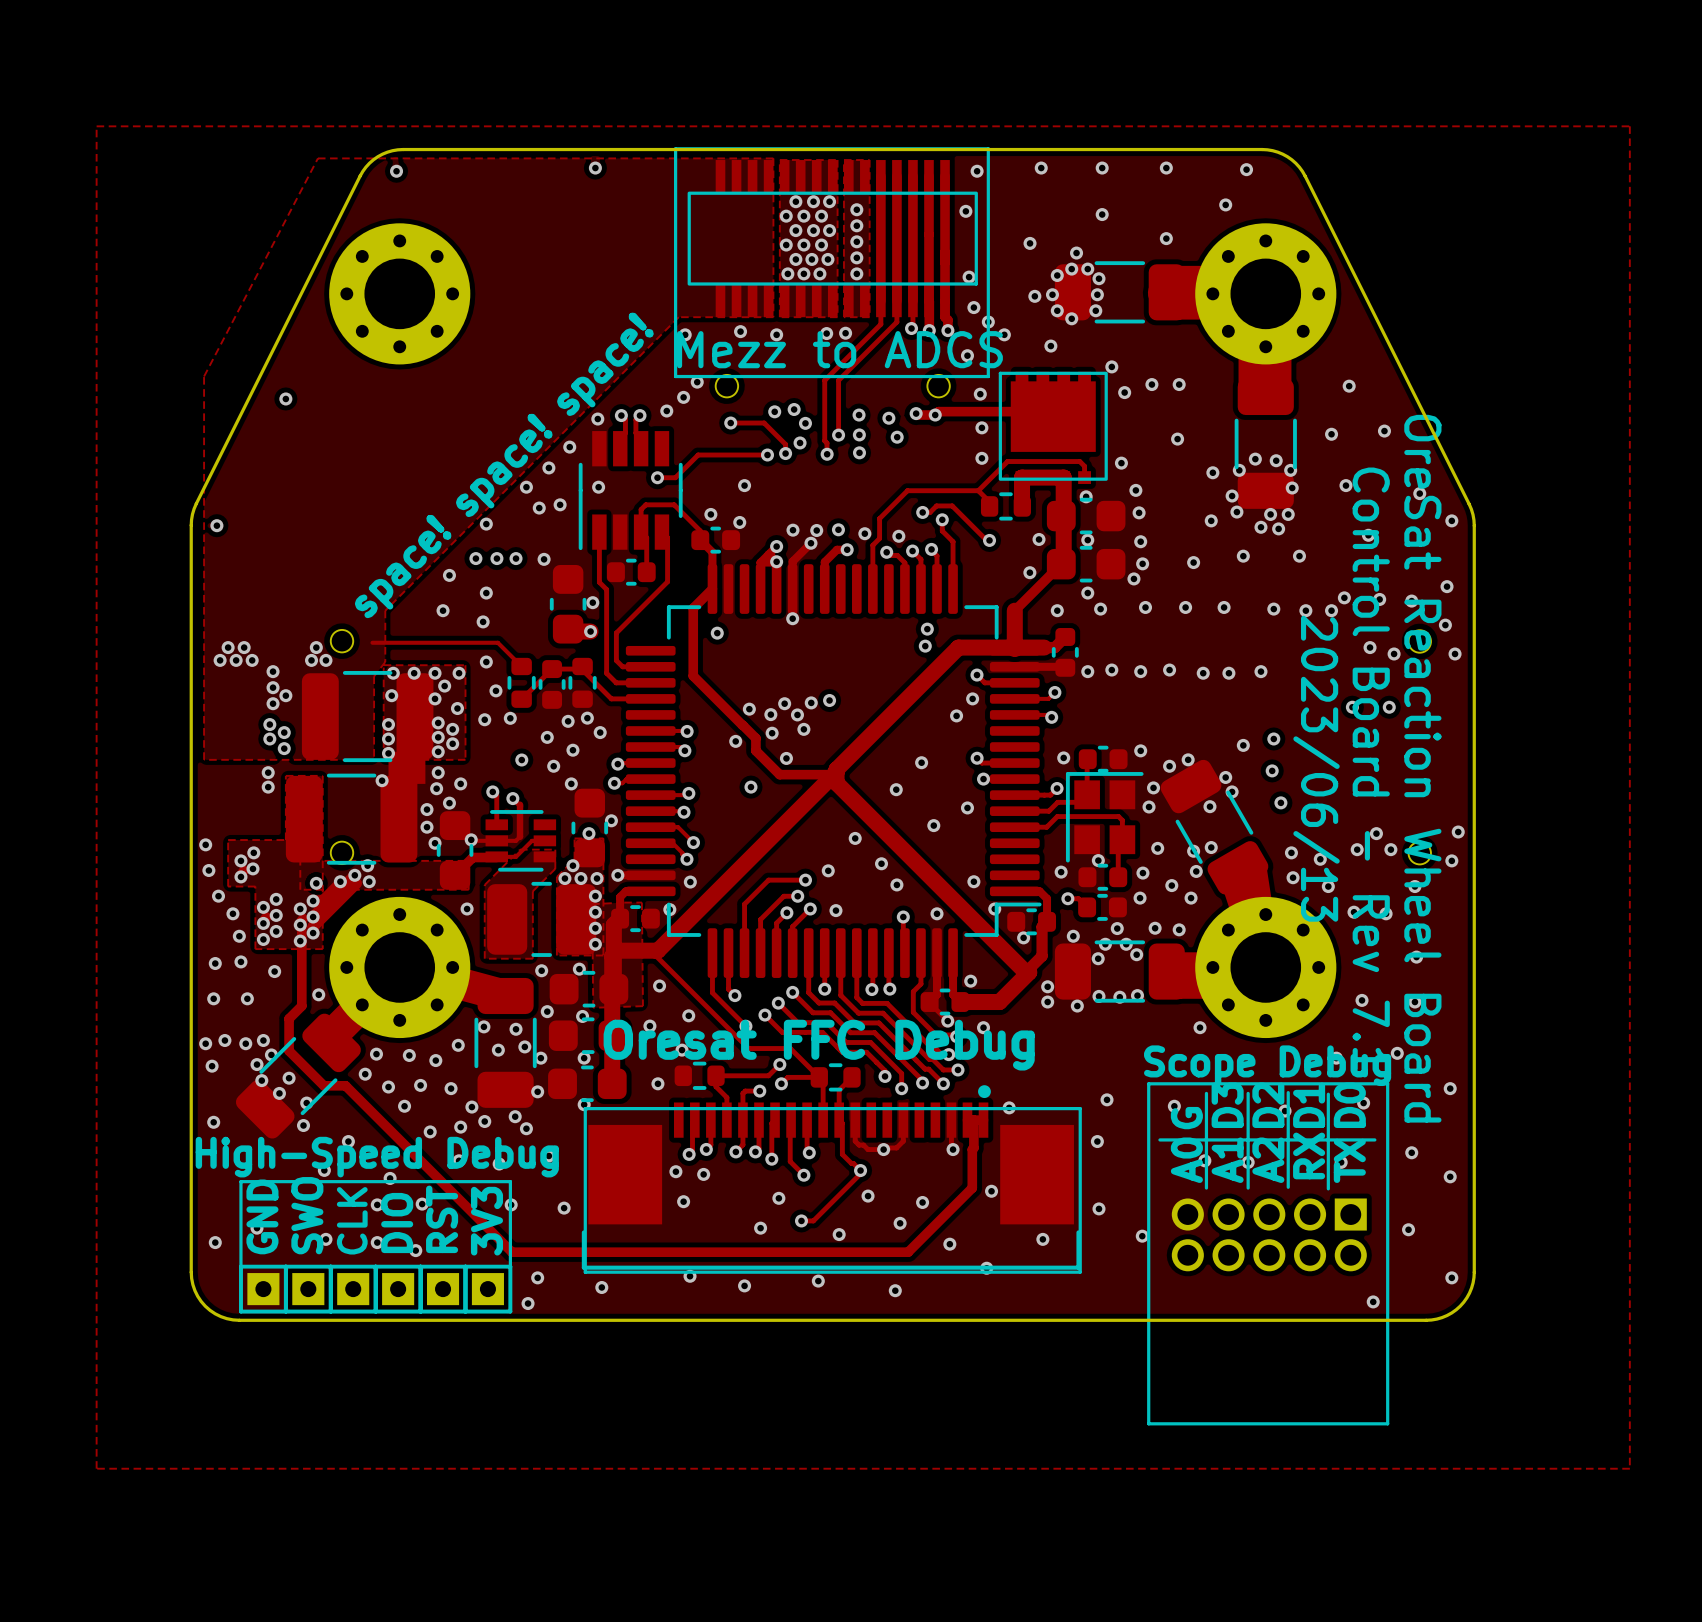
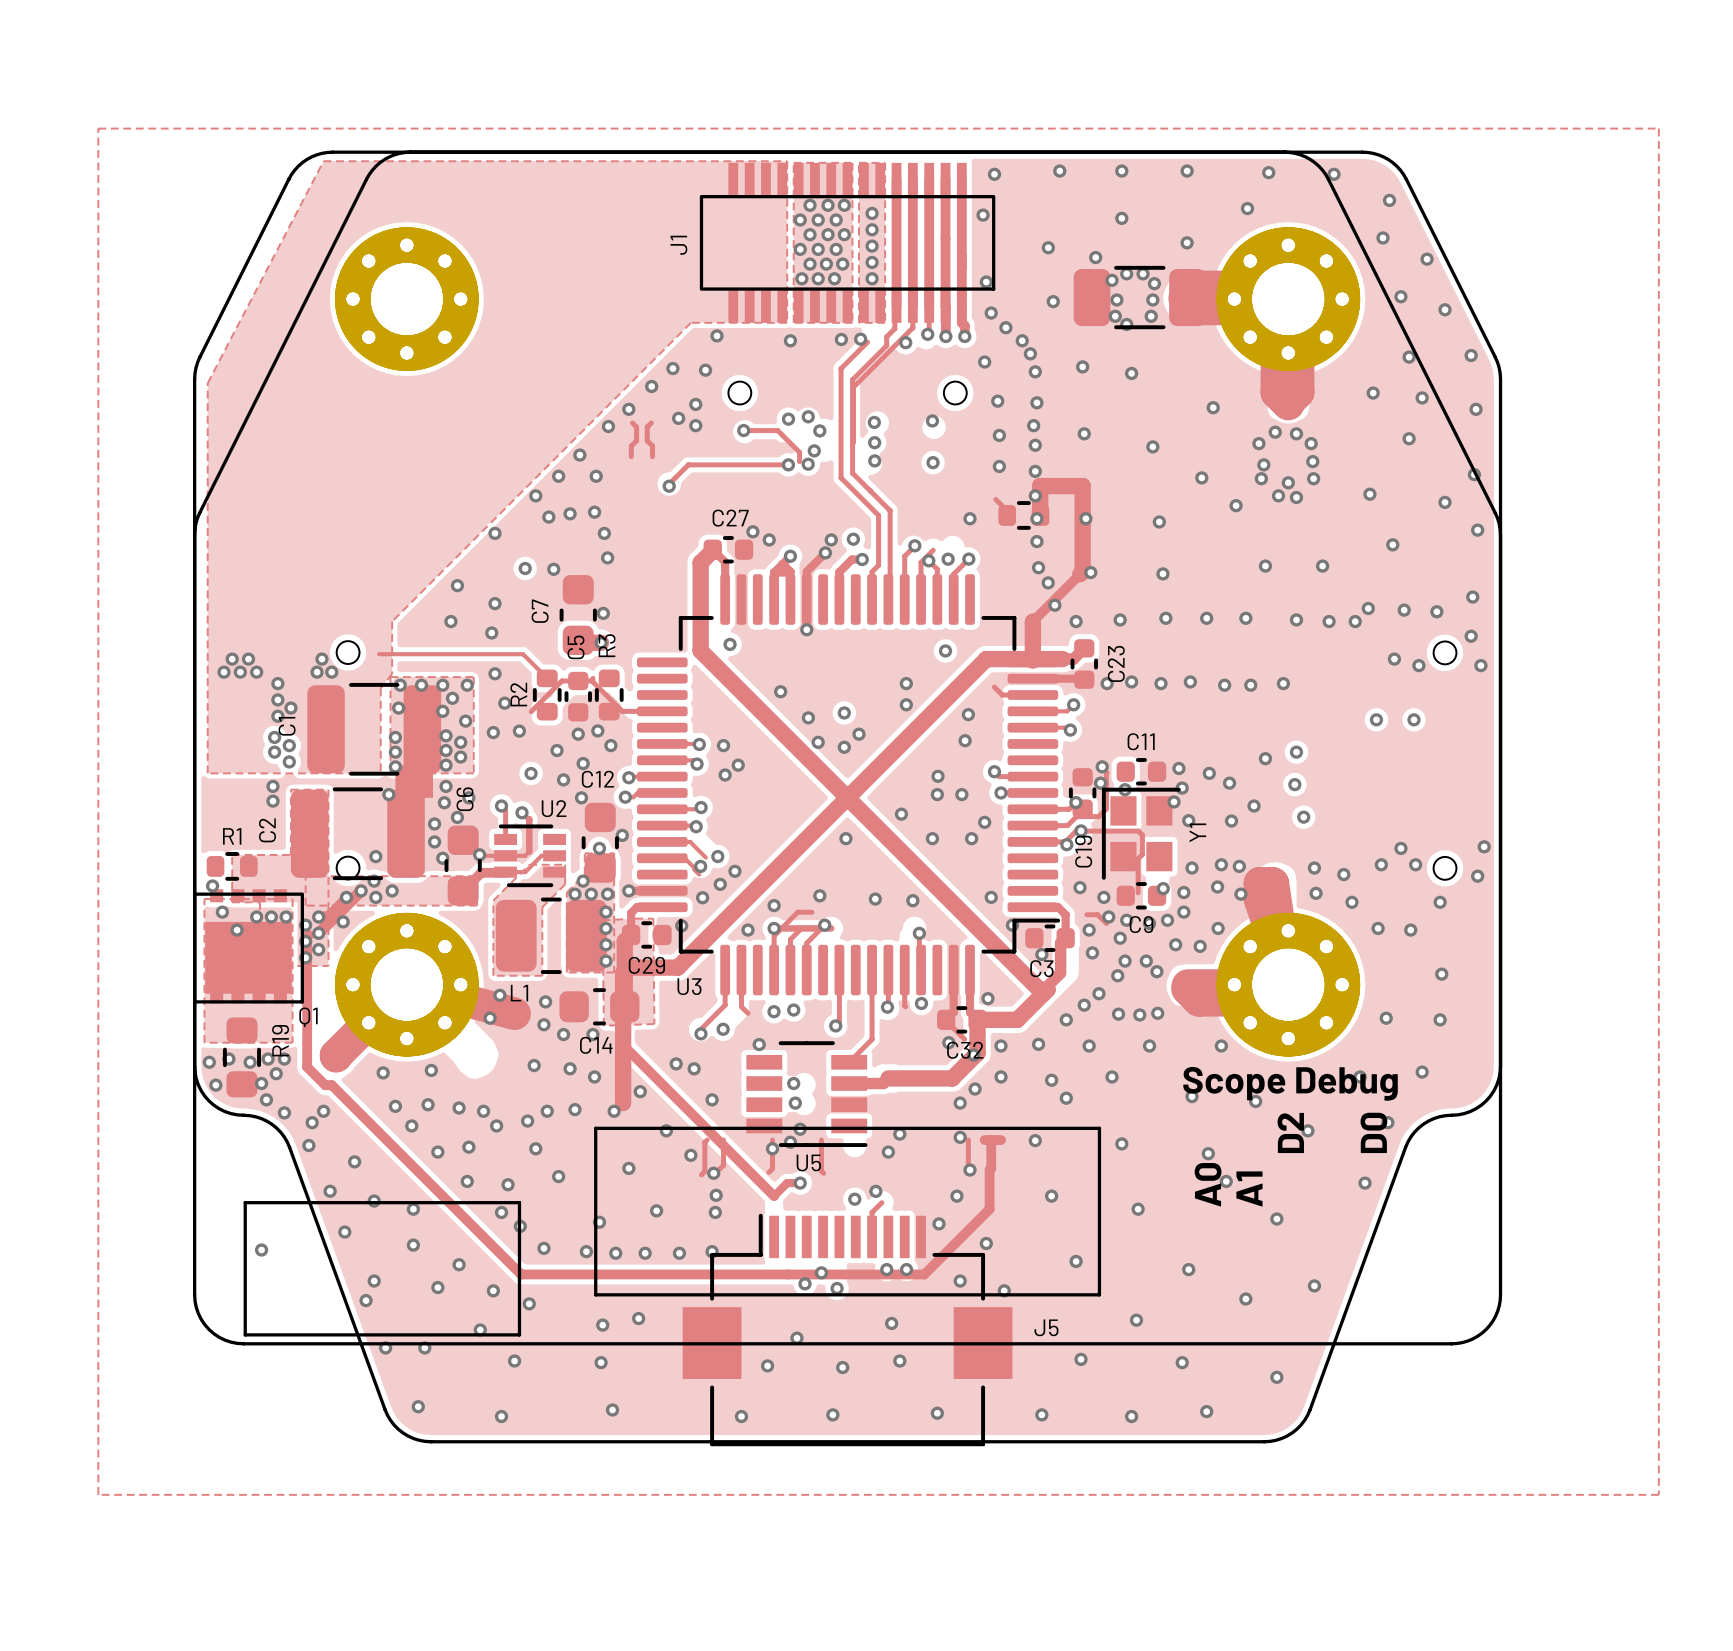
line: (675, 148) (988, 148) (988, 376) (675, 376) (675, 148) -> none
via: (595, 168) -> none
via: (396, 171) -> none
via: none -> (1334, 174)
via: none -> (1389, 200)
via: none -> (1382, 237)
J1 name: none -> J1 (678, 245)
via: none -> (1427, 259)
via: (1071, 269) -> none
via: (1087, 269) -> none
via: none -> (1126, 273)
via: none -> (1143, 273)
via: (1057, 275) -> none
via: none -> (1112, 280)
via: (1098, 278) -> none
via: none -> (1154, 283)
via: none -> (1400, 296)
via: (1052, 294) -> none
via: none -> (1152, 299)
track: (880, 301) (880, 324) (824, 380) (824, 440) (826, 443) (826, 454) -> (896, 306) (894, 308) (894, 328) (886, 336) (886, 345) (852, 379) (852, 473) (890, 510) (890, 597) (888, 599)
via: none -> (1445, 309)
via: (1057, 310) -> none
via: none -> (1151, 316)
via: (1071, 318) -> none
via: none -> (1126, 324)
via: none -> (716, 335)
via: (740, 331) -> none
via: (685, 334) -> none
track: none -> (867, 342) (841, 368) (841, 477) (878, 515) (878, 565) (872, 571) (872, 599)
via: none -> (905, 342)
via: (1050, 346) -> none
via: none -> (1030, 353)
text: Mezz to ADCS (839, 349) -> none
via: none -> (1471, 355)
via: none -> (1409, 357)
via: none -> (1082, 366)
via: none -> (672, 368)
via: none -> (705, 370)
via: none -> (1035, 371)
via: none -> (651, 386)
via: (697, 382) -> none
via: (1151, 384) -> none
via: (1179, 384) -> none
via: none -> (1422, 397)
via: (1124, 392) -> none
via: none -> (1036, 402)
via: (285, 398) -> none
via: none -> (1213, 407)
via: none -> (628, 409)
via: none -> (1476, 409)
track: (916, 413) (935, 415) (938, 411) (1048, 411) (1053, 416) -> none
via: (621, 415) -> none
via: (639, 415) -> none
via: (935, 415) -> none
via: none -> (695, 425)
via: (888, 418) -> none
via: none -> (1033, 425)
via: none -> (1275, 432)
via: none -> (1084, 433)
via: none -> (1296, 433)
part: (1053, 427) -> none
via: (1331, 434) -> none
via: (838, 435) -> none
via: none -> (1258, 443)
via: none -> (1311, 443)
via: (897, 437) -> none
via: none -> (1035, 445)
via: none -> (1152, 446)
via: (1177, 439) -> none
part: (1265, 443) -> none
via: (785, 453) -> none
via: none -> (1312, 461)
via: (827, 454) -> none
via: none -> (933, 462)
track: (767, 455) (698, 455) (675, 477) (657, 477) -> none
via: (767, 455) -> none
track: none -> (788, 464) (688, 464) (669, 484)
via: none -> (788, 464)
via: none -> (808, 464)
via: none -> (1263, 464)
via: (1255, 459) -> none
via: (1276, 460) -> none
via: none -> (1035, 471)
via: (1121, 463) -> none
text: space! space! space! (504, 465) -> none
via: none -> (1474, 474)
via: none -> (596, 476)
via: none -> (1201, 477)
via: (1212, 472) -> none
via: none -> (1288, 482)
track: (1084, 477) (1084, 466) (1079, 461) (1007, 461) (978, 490) (907, 490) (879, 518) (879, 538) (872, 545) (872, 589) -> none
via: (744, 485) -> none
via: (598, 487) -> none
via: none -> (1035, 495)
via: none -> (1278, 495)
via: (1292, 487) -> none
via: none -> (1296, 497)
part: (630, 490) -> none
via: (1135, 490) -> none
via: (1086, 496) -> none
via: none -> (1236, 505)
via: (1232, 496) -> none
via: none -> (594, 512)
C27 name: none -> C27 (730, 518)
via: none -> (1036, 518)
via: none -> (1085, 518)
track: (922, 512) (930, 512) (936, 505) (952, 505) (986, 540) (989, 540) -> none
via: (922, 512) -> none
via: (1236, 512) -> none
via: (710, 514) -> none
via: (1270, 514) -> none
via: (1288, 514) -> none
part: (1086, 516) -> none
track: (942, 519) (942, 530) (953, 541) (953, 589) -> none
via position: (942, 519) -> (970, 518)
via: (1211, 520) -> none
via: none -> (604, 533)
via: (216, 525) -> none
via: (1260, 527) -> none
via: (1278, 528) -> none
via: none -> (769, 539)
via: (792, 530) -> none
track: (599, 532) (599, 582) (606, 589) (606, 673) (616, 682) (650, 682) -> none
track: (661, 532) (667, 537) (667, 581) (616, 632) (616, 660) (622, 666) (650, 666) -> none
via: none -> (1036, 541)
via: (864, 533) -> none
track: none -> (913, 547) (904, 556) (904, 599)
via: (1039, 539) -> none
track: (700, 540) (700, 530) (674, 504) (645, 504) (641, 509) (641, 532) (646, 537) (646, 572) -> (713, 549) (700, 562) (700, 650) (1043, 993)
via: (989, 540) -> none
via: (1087, 540) -> none
via: (1140, 541) -> none
via: none -> (607, 557)
track: (931, 549) (937, 555) (937, 564) -> (968, 559) (953, 574)
via: none -> (968, 559)
track: (886, 552) (889, 555) (897, 555) (904, 562) -> (933, 550) (921, 562) (921, 572)
via: (886, 552) -> none
via: none -> (1038, 567)
via: (475, 558) -> none
via: (496, 558) -> none
via: (776, 561) -> none
via: none -> (1090, 572)
via: (1193, 562) -> none
part: (1086, 564) -> none
part: (631, 572) -> none
via: (1133, 578) -> none
track: (712, 589) (693, 608) (693, 675) (755, 738) (755, 750) (779, 774) (831, 774) (836, 769) -> none
via: (1087, 593) -> none
via: none -> (1054, 605)
C7 name: none -> C7 (540, 611)
via: (927, 629) -> none
R3 name: none -> R3 (607, 645)
C5 name: none -> C5 (576, 647)
via: none -> (945, 650)
track: (497, 642) (521, 666) -> (506, 654) (523, 654) (547, 678)
via: (925, 646) -> none
track: (969, 647) (958, 647) (836, 769) -> none
C23 name: none -> C23 (1116, 663)
via: none -> (906, 683)
via: (976, 675) -> none
via: none -> (780, 691)
R2 name: none -> R2 (518, 694)
R2 position: (521, 682) -> (547, 695)
R3 position: (582, 682) -> (609, 695)
C5 position: (552, 684) -> (578, 696)
via: none -> (906, 704)
via: (972, 698) -> none
via: (811, 702) -> none
via: none -> (968, 714)
via: (784, 703) -> none
via: none -> (808, 717)
via: (749, 709) -> none
C1 name: none -> C1 (287, 726)
via: (770, 714) -> none
via: (797, 714) -> none
via position: (956, 715) -> (965, 740)
via: none -> (859, 734)
C11 name: none -> C11 (1141, 741)
via: none -> (723, 745)
via: (772, 733) -> none
via: none -> (844, 747)
via position: (735, 741) -> (738, 765)
via: (1140, 750) -> none
via: none -> (1102, 766)
via: none -> (1178, 768)
via: (1063, 757) -> none
via: (786, 758) -> none
C11 position: (1103, 759) -> (1141, 771)
via: none -> (725, 774)
C12 name: none -> C12 (598, 779)
via: (1169, 766) -> none
text: 2023/06/13 (1316, 768) -> none
text: OreSat Reaction Wheel Board (1422, 768) -> none
track: (836, 769) (836, 783) (1025, 972) -> none
via: none -> (1100, 783)
via: none -> (1229, 783)
text: Control Board - Rev 7.1 (1371, 769) -> none
track: (836, 772) (657, 950) -> (986, 659) (677, 967) (669, 967)
via: none -> (1182, 788)
via: none -> (1125, 789)
via: (1225, 777) -> none
C19: none -> (1082, 792)
via: none -> (937, 794)
via: none -> (961, 794)
part: none -> (847, 796)
C6 name: none -> C6 (465, 799)
via: (750, 787) -> none
via position: (896, 789) -> (901, 814)
U2 name: none -> U2 (554, 808)
via: (1149, 806) -> none
via: none -> (1188, 820)
C2 name: none -> C2 (267, 830)
via: none -> (1081, 830)
Y1 position: (1104, 817) -> (1141, 833)
Y1 name: none -> Y1 (1197, 832)
via: none -> (845, 838)
via: none -> (932, 838)
via: none -> (971, 838)
via: (933, 825) -> none
part: (1214, 827) -> none
via: none -> (1066, 844)
via: (855, 838) -> none
via: none -> (375, 856)
via: none -> (717, 856)
via: (693, 842) -> none
via: (205, 844) -> none
via: (1211, 847) -> none
via: (1157, 848) -> none
via: none -> (1221, 864)
R1: none -> (232, 866)
via: none -> (700, 866)
via: (1193, 851) -> none
via: none -> (1239, 866)
via: (253, 852) -> none
via: none -> (1192, 868)
via: none -> (734, 871)
via: (686, 859) -> none
via: (240, 860) -> none
via: (1098, 860) -> none
via: (881, 863) -> none
via: (252, 868) -> none
via: none -> (720, 884)
track: (244, 870) (242, 872) -> none
via: (828, 870) -> none
via: none -> (392, 890)
via: (240, 876) -> none
via: none -> (1183, 892)
part: (1102, 877) -> none
via: none -> (1240, 894)
track: (805, 880) (768, 880) (744, 904) (744, 953) -> none
C9: none -> (1141, 895)
via: none -> (1103, 897)
zone outline: none -> (204, 899) (204, 1042) (292, 1042) (292, 899) (204, 899)
via: (316, 883) -> none
track: (356, 883) (313, 926) (313, 933) -> none
via: none -> (875, 899)
via: (1171, 885) -> none
via: none -> (774, 905)
via: (797, 896) -> none
via: none -> (1183, 912)
via: (1067, 898) -> none
via: (1140, 898) -> none
via: (1191, 898) -> none
via: (276, 899) -> none
via: none -> (256, 917)
via: none -> (271, 917)
via: none -> (286, 917)
via: none -> (1108, 917)
via: none -> (1126, 920)
via: none -> (1167, 920)
via: none -> (343, 921)
via: (263, 907) -> none
part: (1102, 907) -> none
via: none -> (1149, 923)
via: (467, 908) -> none
via: (835, 910) -> none
track: none -> (774, 928) (831, 928)
via: none -> (774, 928)
via: (786, 912) -> none
via: none -> (1218, 928)
via: none -> (748, 930)
via: (937, 913) -> none
via: none -> (1089, 930)
via: (276, 915) -> none
track: (266, 917) (264, 918) -> none
via: none -> (1120, 938)
via: (263, 923) -> none
via: (1117, 928) -> none
Q1: none -> (248, 946)
via: (276, 931) -> none
via: (239, 936) -> none
via: (263, 939) -> none
C29 name: none -> C29 (646, 965)
track: (656, 950) (656, 956) (748, 1048) (790, 1048) (823, 1081) (823, 1120) -> none
C3 name: none -> C3 (1041, 968)
track: (808, 953) (808, 992) (819, 1003) (834, 1003) (854, 1022) (878, 1022) (925, 1069) (928, 1069) (943, 1083) -> none
track: (840, 953) (840, 995) (858, 1013) (883, 1013) (929, 1059) (932, 1059) (943, 1069) (957, 1069) -> none
track: (920, 953) (920, 984) (913, 991) (913, 1012) (935, 1034) (955, 1034) (956, 1036) -> none
via: (240, 961) -> none
via: (215, 963) -> none
via: (579, 969) -> none
U3 name: none -> U3 (689, 986)
via: (541, 970) -> none
via: (274, 971) -> none
part: (1119, 971) -> none
L1 name: none -> L1 (519, 993)
via: none -> (1098, 993)
via: none -> (499, 995)
via: none -> (545, 1001)
via: (659, 985) -> none
via: (1047, 986) -> none
track: (712, 987) (712, 992) (745, 1026) -> (725, 1005) (700, 1029)
via: none -> (1084, 1005)
track: none -> (624, 1006) (624, 1046) (774, 1196) (787, 1183) (800, 1183)
track: none -> (839, 1006) (839, 1022) (835, 1025)
via: (824, 989) -> none
via position: (889, 989) -> (921, 1003)
via: none -> (793, 1010)
track: (792, 992) (813, 1012) (830, 1012) (850, 1032) (874, 1032) (922, 1080) (922, 1082) -> none
via: (792, 992) -> none
via: (318, 994) -> none
via: none -> (774, 1011)
via: (734, 995) -> none
track: (856, 997) (862, 1003) (887, 1003) (933, 1049) (936, 1049) (941, 1054) (948, 1054) -> (872, 1015) (872, 1039) (849, 1062)
via: (213, 998) -> none
via: (247, 998) -> none
via: none -> (490, 1018)
track: none -> (977, 1019) (977, 1053) (952, 1078) (888, 1078) (883, 1083) (849, 1083)
track: (778, 1003) (797, 1022) (826, 1022) (846, 1042) (870, 1042) (901, 1073) (901, 1088) -> none
via: (778, 1003) -> none
track: (301, 1006) (289, 1018) (289, 1050) (323, 1085) (345, 1085) -> (307, 1023) (307, 1067) (325, 1085) (331, 1085) (351, 1105)
via: none -> (543, 1024)
via: (1077, 1006) -> none
via: none -> (835, 1025)
via: (547, 1011) -> none
via: none -> (723, 1029)
track: (764, 1015) (782, 1032) (822, 1032) (842, 1052) (866, 1052) (885, 1070) (885, 1076) -> none
via: (764, 1015) -> none
via: none -> (563, 1034)
via position: (947, 1021) -> (948, 1042)
via: (483, 1026) -> none
C14 name: none -> C14 (596, 1045)
via: (649, 1026) -> none
via: none -> (1038, 1044)
via: none -> (1089, 1045)
via: none -> (1149, 1045)
via: (516, 1029) -> none
C32 name: none -> C32 (965, 1050)
part: (588, 1035) -> none
R19: none -> (241, 1057)
via: none -> (284, 1059)
part: (505, 1042) -> none
via: (458, 1045) -> none
via: none -> (676, 1063)
text: Oresat FFC Debug (819, 1045) -> none
via: (498, 1050) -> none
via: none -> (570, 1068)
via: (948, 1054) -> none
via: (409, 1055) -> none
via: (540, 1058) -> none
via: none -> (1001, 1076)
via: none -> (1112, 1076)
via position: (435, 1060) -> (431, 1070)
via: none -> (1051, 1080)
track: (779, 1064) (768, 1075) (716, 1075) (716, 1086) (726, 1097) (726, 1120) -> none
via: none -> (640, 1091)
via: (365, 1074) -> none
U5: none -> (806, 1094)
part: (699, 1075) -> none
part: (298, 1076) -> none
via: (885, 1076) -> none
track: (819, 1077) (787, 1077) (781, 1083) -> none
part: (835, 1077) -> none
track: (852, 1077) (839, 1090) (839, 1120) (842, 1123) (842, 1154) (860, 1170) (860, 1173) (813, 1220) (801, 1220) -> none
via: none -> (1192, 1096)
via: (289, 1078) -> none
via: none -> (1066, 1098)
via: none -> (712, 1099)
via: (922, 1082) -> none
via: none -> (1255, 1101)
part: (587, 1083) -> none
via: (657, 1083) -> none
line: (1148, 1083) (1387, 1083) (1387, 1423) (1148, 1423) (1148, 1083) -> none
via: (901, 1088) -> none
via: (1450, 1088) -> none
via: none -> (574, 1109)
via: none -> (323, 1111)
via: none -> (483, 1111)
via: none -> (614, 1111)
track: (759, 1091) (745, 1091) (742, 1093) (742, 1144) (735, 1151) -> none
via: (759, 1091) -> none
line: (1288, 1092) (1288, 1187) -> none
line: (1206, 1093) (1206, 1188) -> none
line: (1248, 1093) (1248, 1188) -> none
line: (1328, 1094) (1328, 1188) -> none
via: (1107, 1099) -> none
via: none -> (527, 1121)
via: (584, 1104) -> none
text: D3 (1227, 1105) -> none
text: D1 (1309, 1105) -> none
via: none -> (496, 1125)
via: (1174, 1106) -> none
via: (471, 1107) -> none
via position: (1009, 1107) -> (1035, 1140)
via: none -> (800, 1129)
via: none -> (666, 1130)
via: none -> (899, 1134)
via: (515, 1116) -> none
via: none -> (960, 1137)
text: G (1186, 1118) -> none
track: (775, 1120) (771, 1123) (771, 1159) -> none
track: (791, 1120) (790, 1161) (803, 1175) -> none
track: (855, 1120) (855, 1141) (868, 1149) (896, 1147) (903, 1141) (903, 1120) -> none
via: (484, 1121) -> none
via: (213, 1122) -> none
via: none -> (790, 1142)
via: none -> (1121, 1143)
via: none -> (772, 1148)
via: none -> (888, 1152)
via: none -> (1208, 1153)
via: none -> (690, 1155)
line: (1159, 1139) (1374, 1139) -> none
via: (1097, 1141) -> none
via: none -> (628, 1168)
via: (706, 1149) -> none
via: (883, 1149) -> none
via: (735, 1151) -> none
via: (755, 1151) -> none
via: none -> (713, 1173)
via: (809, 1152) -> none
via: (1411, 1152) -> none
via: (689, 1154) -> none
text: RX (1309, 1155) -> none
text: High-Speed Debug (377, 1157) -> none
via: (771, 1159) -> none
text: A2 (1268, 1160) -> none
text: TX (1349, 1160) -> none
via: none -> (800, 1183)
via: (1248, 1162) -> none
via: (675, 1171) -> none
via: (803, 1175) -> none
via: none -> (956, 1196)
via: none -> (1051, 1196)
via: (1450, 1176) -> none
part: (831, 1177) -> none
via: (390, 1178) -> none
via: none -> (854, 1199)
via: none -> (374, 1201)
track: none -> (881, 1202) (872, 1212) (872, 1236)
via: none -> (413, 1209)
via: none -> (1138, 1209)
via: none -> (656, 1210)
via: none -> (501, 1212)
via: none -> (715, 1212)
via: (991, 1191) -> none
via: (868, 1196) -> none
via: none -> (1276, 1218)
via: (778, 1198) -> none
via: none -> (599, 1222)
via: (683, 1201) -> none
via: (377, 1204) -> none
via: (422, 1204) -> none
via: (564, 1208) -> none
via: (1098, 1208) -> none
via: none -> (344, 1232)
text: SWO (307, 1215) -> none
text: GND (262, 1216) -> none
text: RST (442, 1219) -> none
text: CLK (352, 1220) -> none
via: (801, 1220) -> none
text: 3V3 (486, 1221) -> none
via: none -> (986, 1243)
text: DIO (397, 1223) -> none
via: none -> (413, 1245)
via: (900, 1223) -> none
via: none -> (543, 1248)
via: (760, 1228) -> none
via: none -> (586, 1251)
via: none -> (712, 1251)
via: (1408, 1229) -> none
via: none -> (615, 1253)
via: none -> (645, 1253)
via: none -> (679, 1253)
via: (839, 1234) -> none
part: (1269, 1234) -> none
via: (1142, 1236) -> none
via: (325, 1239) -> none
via position: (1042, 1239) -> (1076, 1261)
via: (215, 1242) -> none
via: (377, 1242) -> none
via: none -> (459, 1264)
via: (949, 1244) -> none
via: none -> (886, 1269)
via: none -> (906, 1269)
via: none -> (1188, 1269)
via: (415, 1250) -> none
via: none -> (821, 1272)
via: none -> (374, 1281)
via: none -> (960, 1281)
via: none -> (805, 1283)
via: none -> (1314, 1285)
via: none -> (437, 1287)
via: none -> (493, 1290)
via: (690, 1276) -> none
via: none -> (1245, 1298)
via: none -> (366, 1300)
via: (537, 1277) -> none
via: (1451, 1277) -> none
via: none -> (529, 1303)
via position: (818, 1281) -> (837, 1288)
via: (744, 1285) -> none
via: (601, 1287) -> none
part: (263, 1289) -> none
part: (308, 1289) -> none
part: (353, 1289) -> none
part: (398, 1289) -> none
part: (443, 1289) -> none
part: (487, 1289) -> none
via: (895, 1290) -> none
via: none -> (638, 1318)
via: none -> (1136, 1320)
via: none -> (891, 1323)
via: none -> (602, 1325)
via: (1373, 1301) -> none
via: (528, 1303) -> none
via: none -> (480, 1329)
J5: none -> (847, 1329)
via: none -> (796, 1338)
via: none -> (385, 1347)
via: none -> (424, 1347)
via: none -> (1081, 1359)
via: none -> (514, 1361)
via: none -> (899, 1361)
via: none -> (601, 1362)
via: none -> (1182, 1362)
via: none -> (767, 1365)
via: none -> (842, 1367)
via: none -> (1276, 1377)
via: none -> (418, 1406)
via: none -> (612, 1409)
via: none -> (1206, 1411)
via: none -> (937, 1413)
via: none -> (832, 1414)
via: none -> (1041, 1414)
via: none -> (501, 1416)
via: none -> (741, 1416)
via: none -> (1131, 1416)

